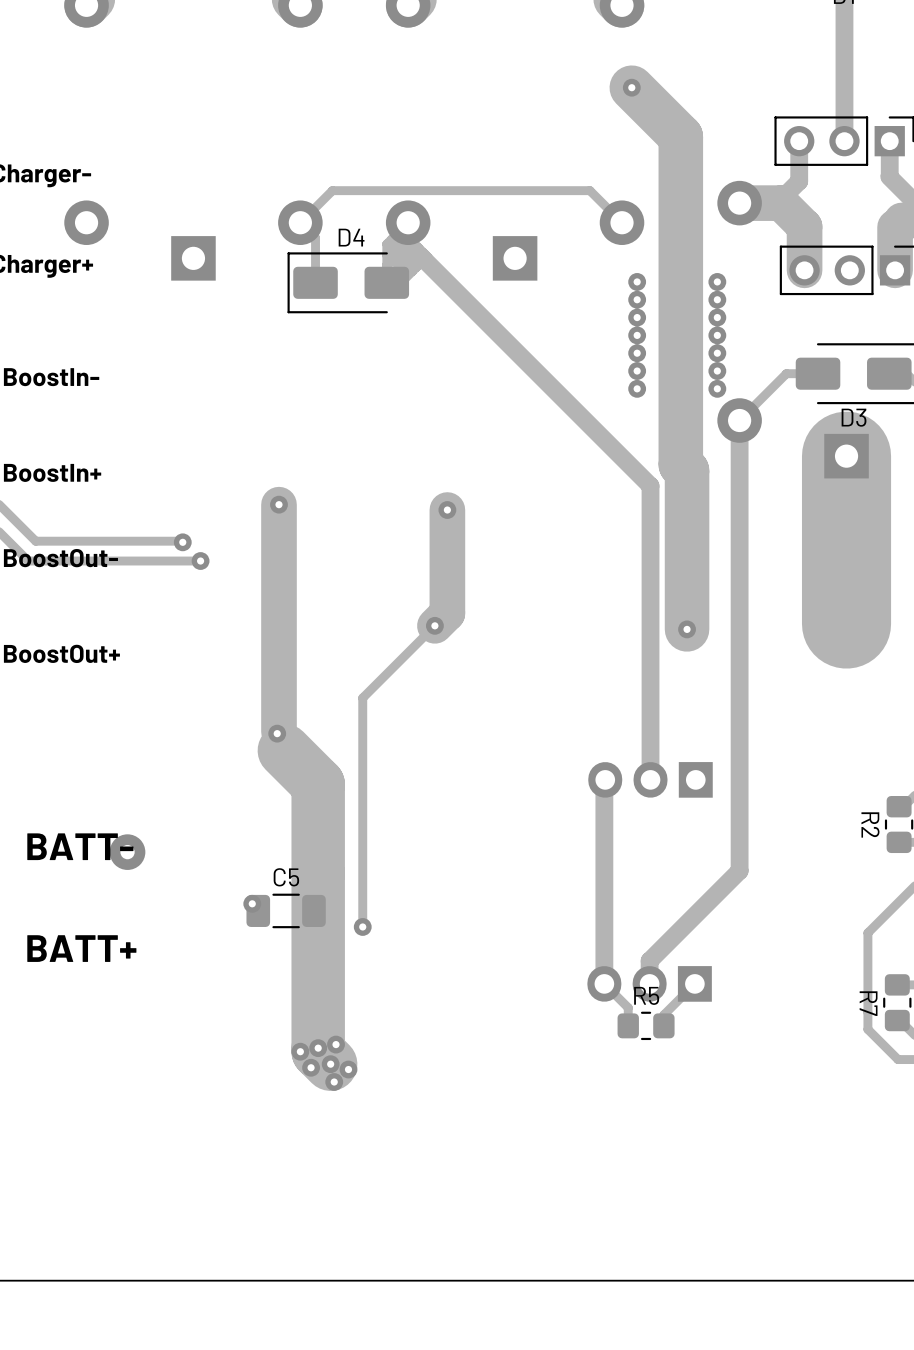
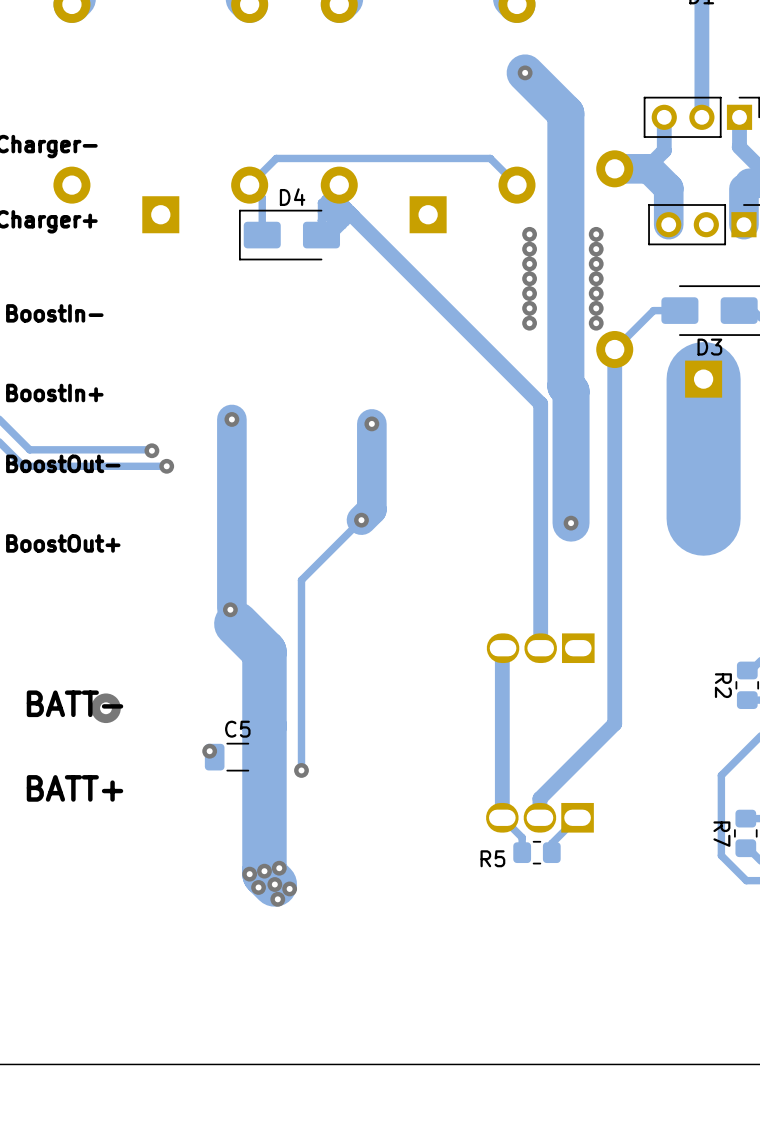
part footprint: [588, 762, 713, 798] -> [486, 633, 595, 664]
part footprint: [587, 966, 712, 1002] -> [486, 802, 594, 833]
R5 name position: R5 (646, 995) -> R5 (492, 858)

